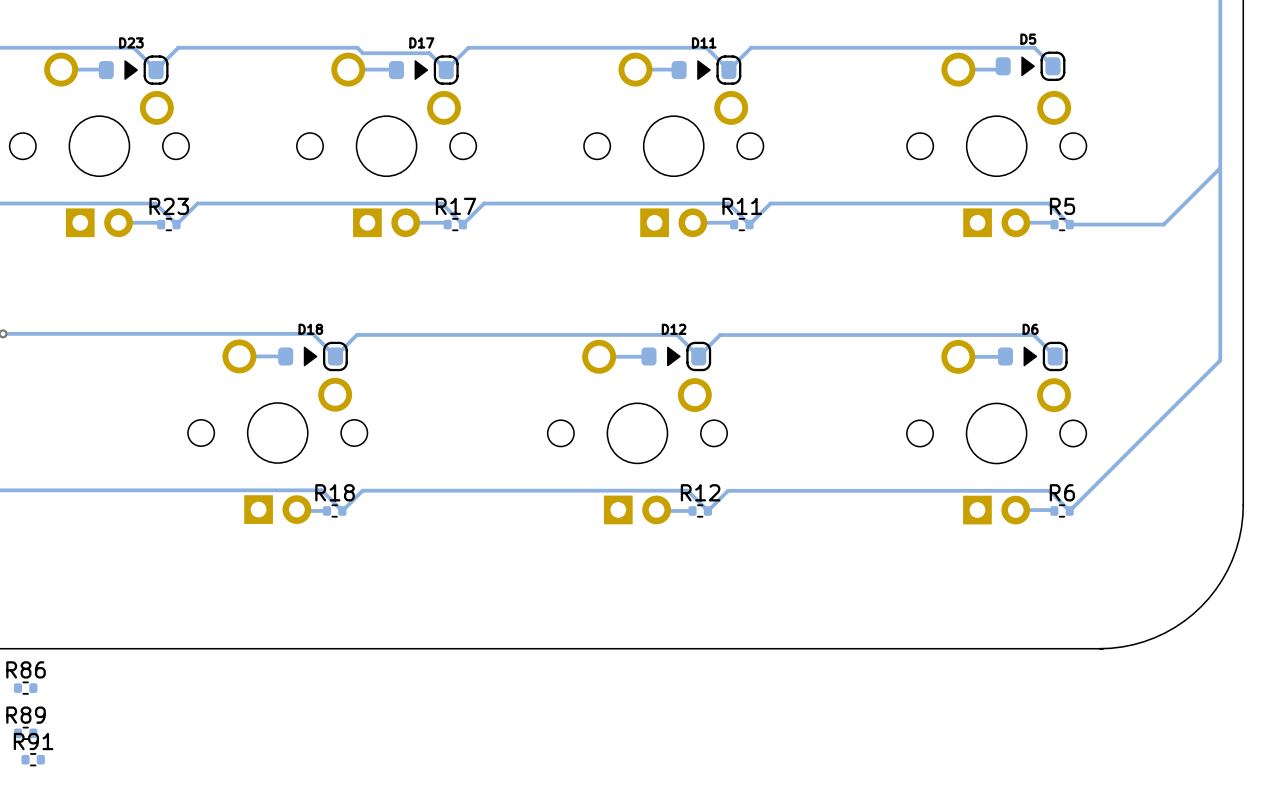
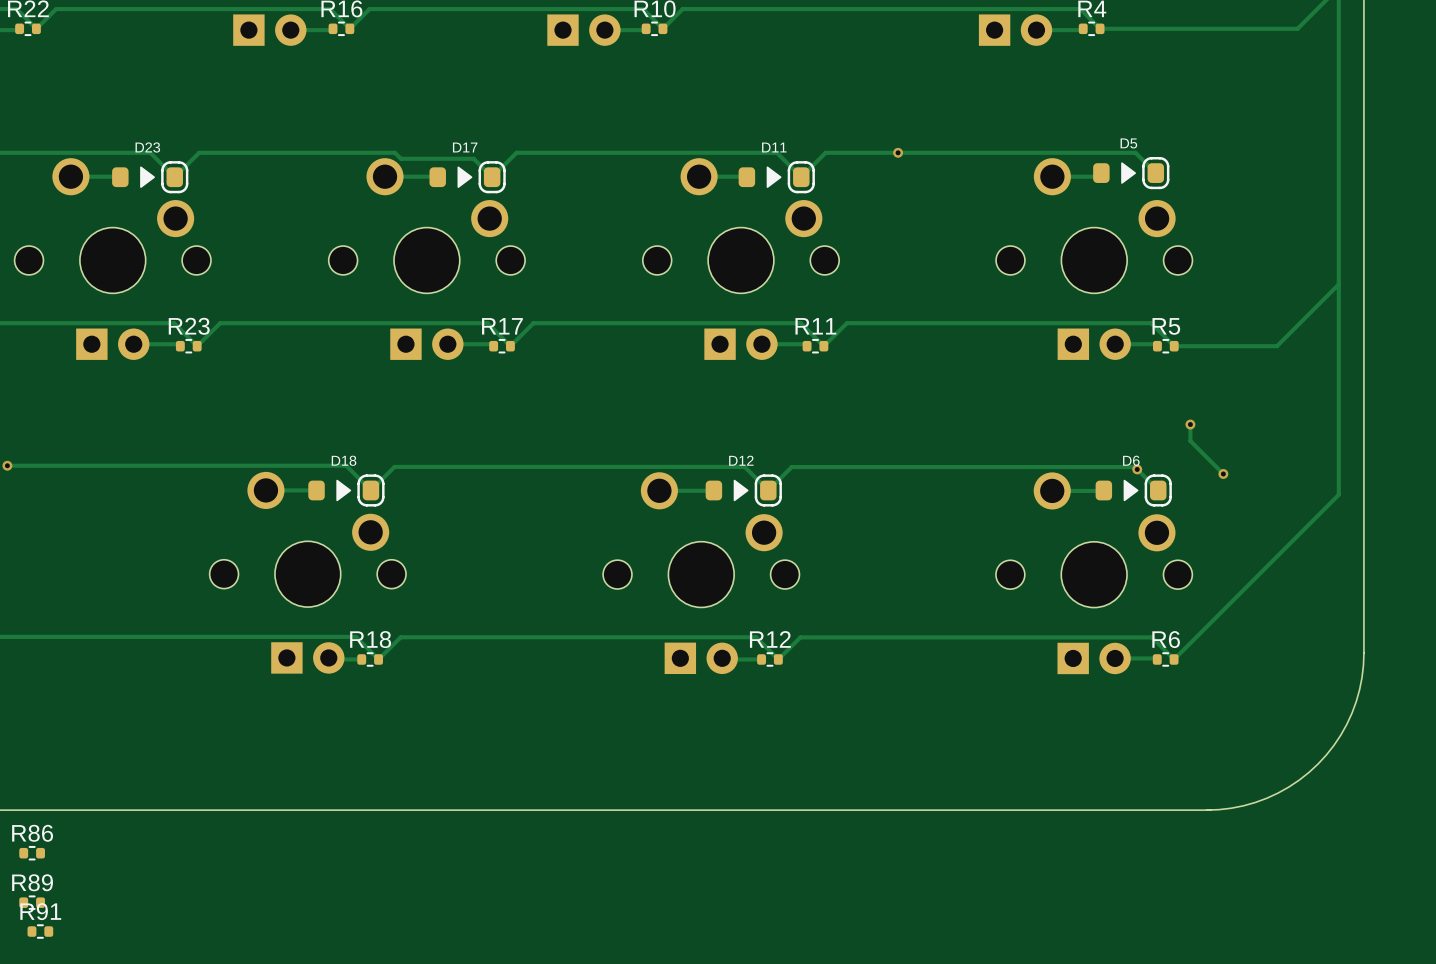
via: none -> (898, 152)
track: none -> (1190, 424) (1190, 441) (1223, 473)
via: none -> (1190, 424)
via: none -> (1137, 469)
via: none -> (1223, 473)

